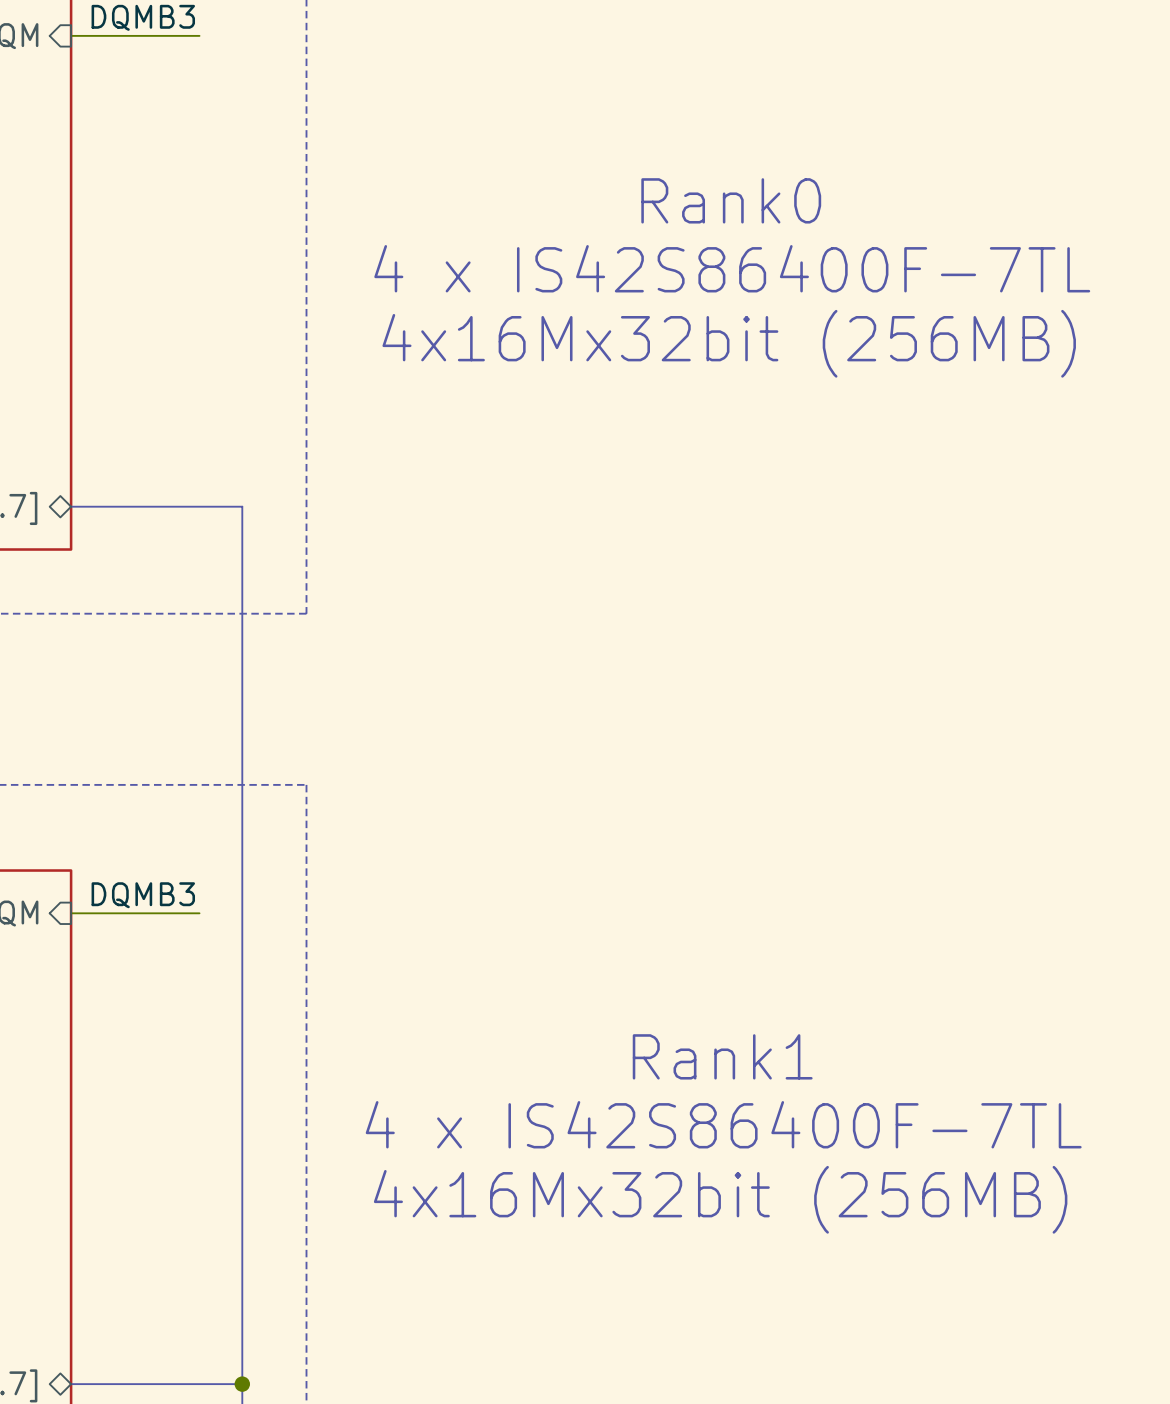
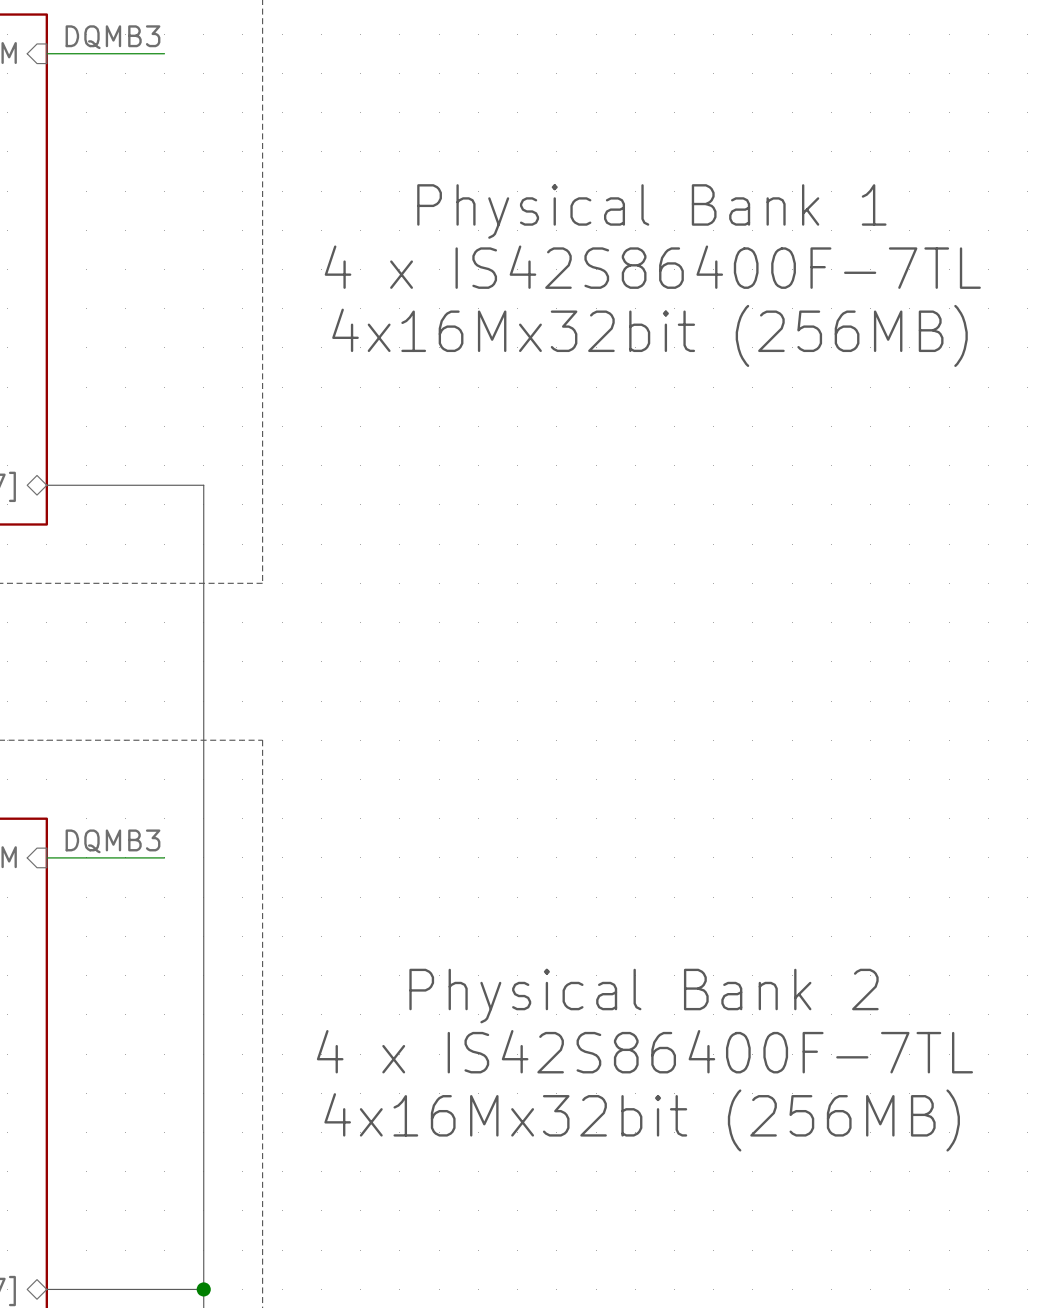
text: Rank0 (731, 200) -> Physical Bank 1 (651, 211)
text: Rank1 (722, 1056) -> Physical Bank 2 (644, 996)

